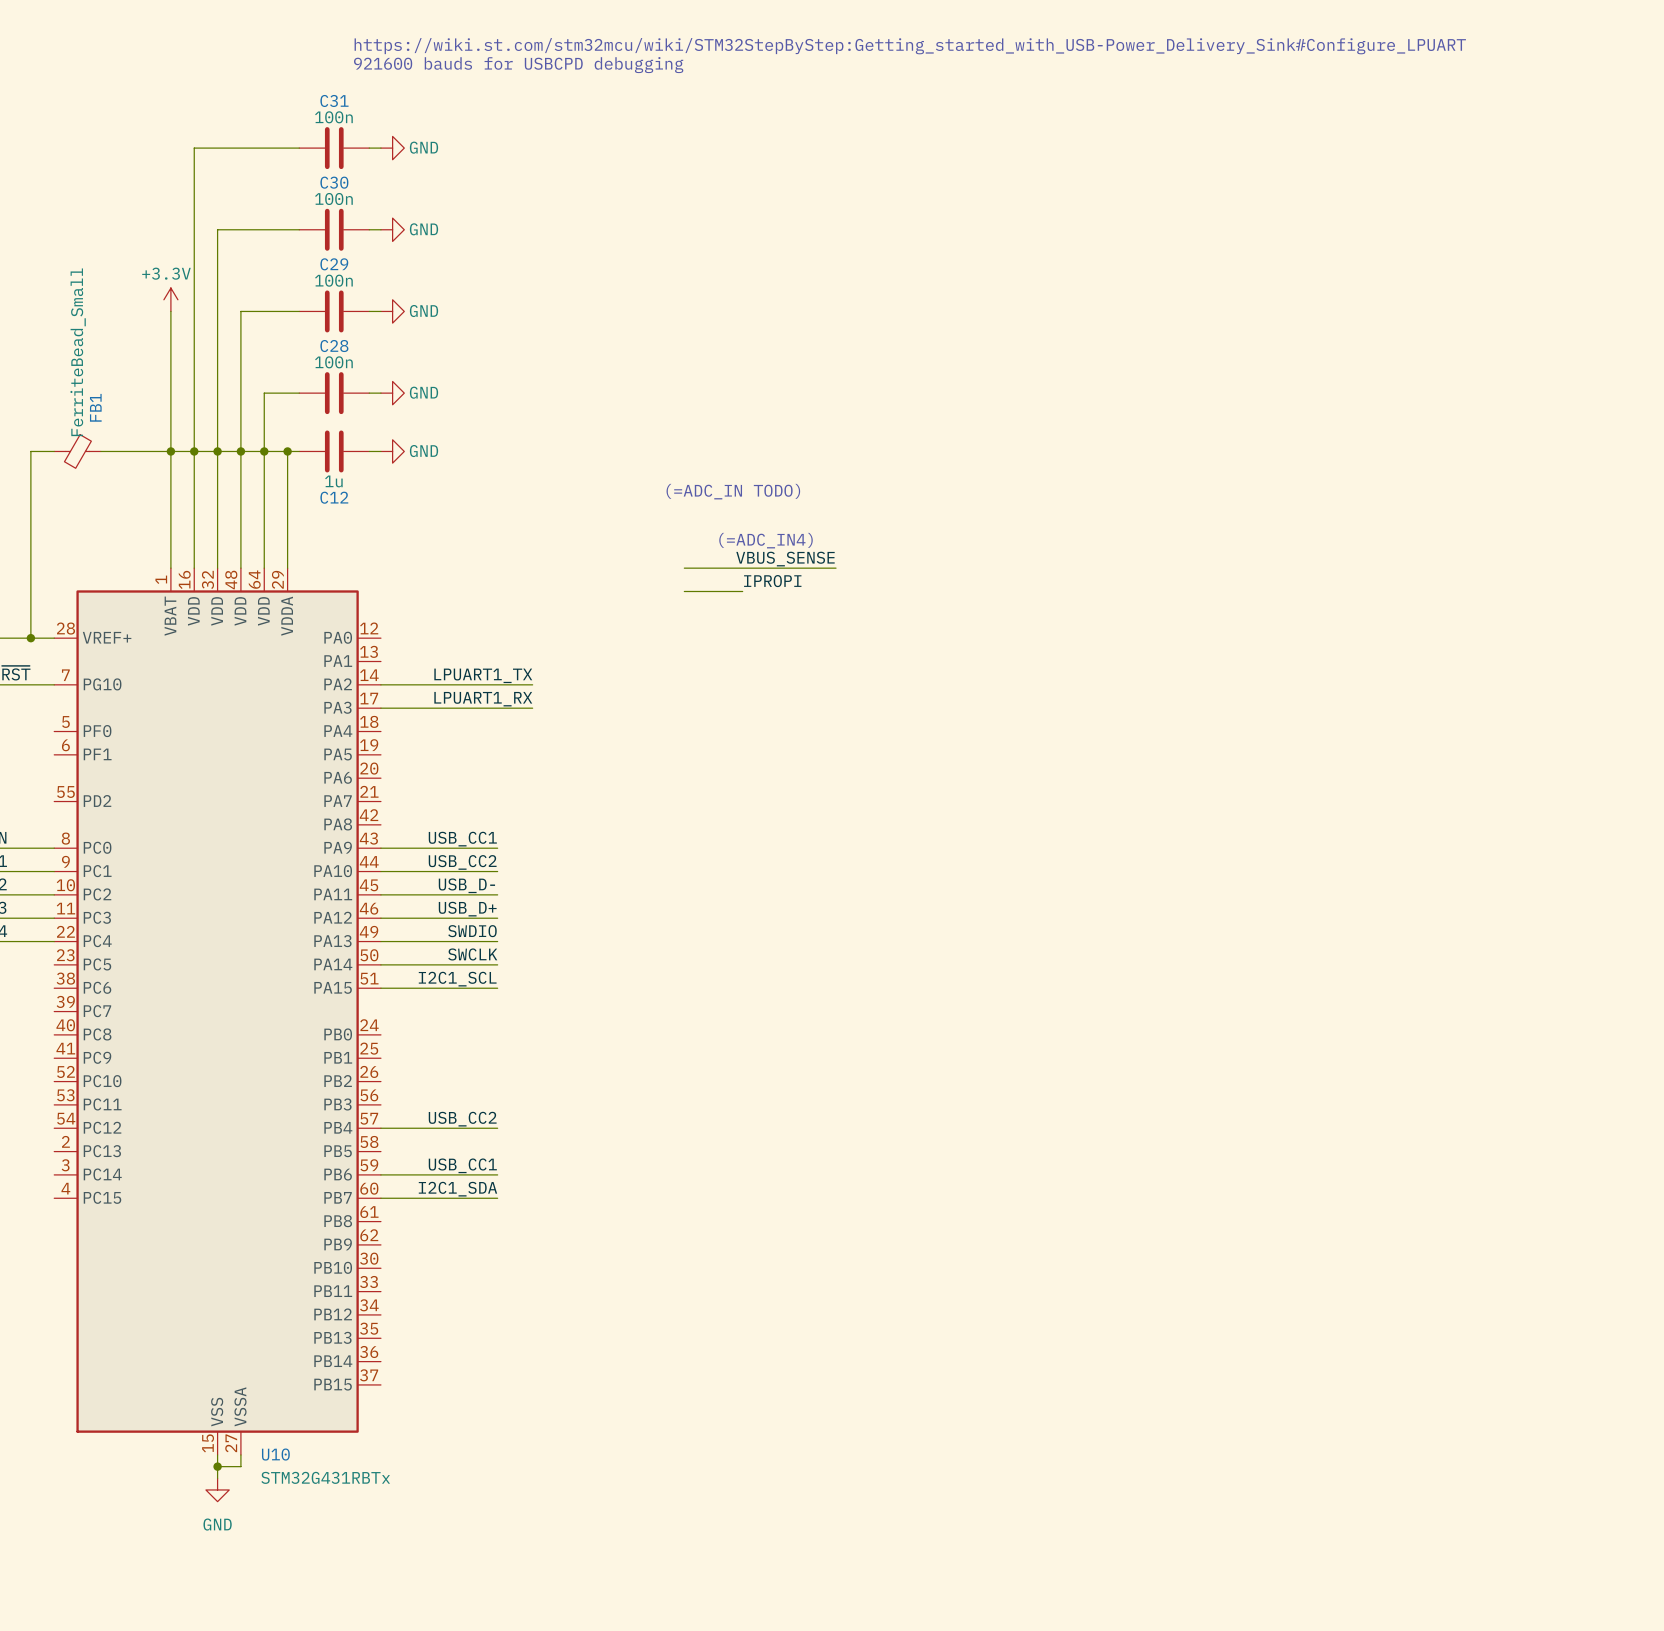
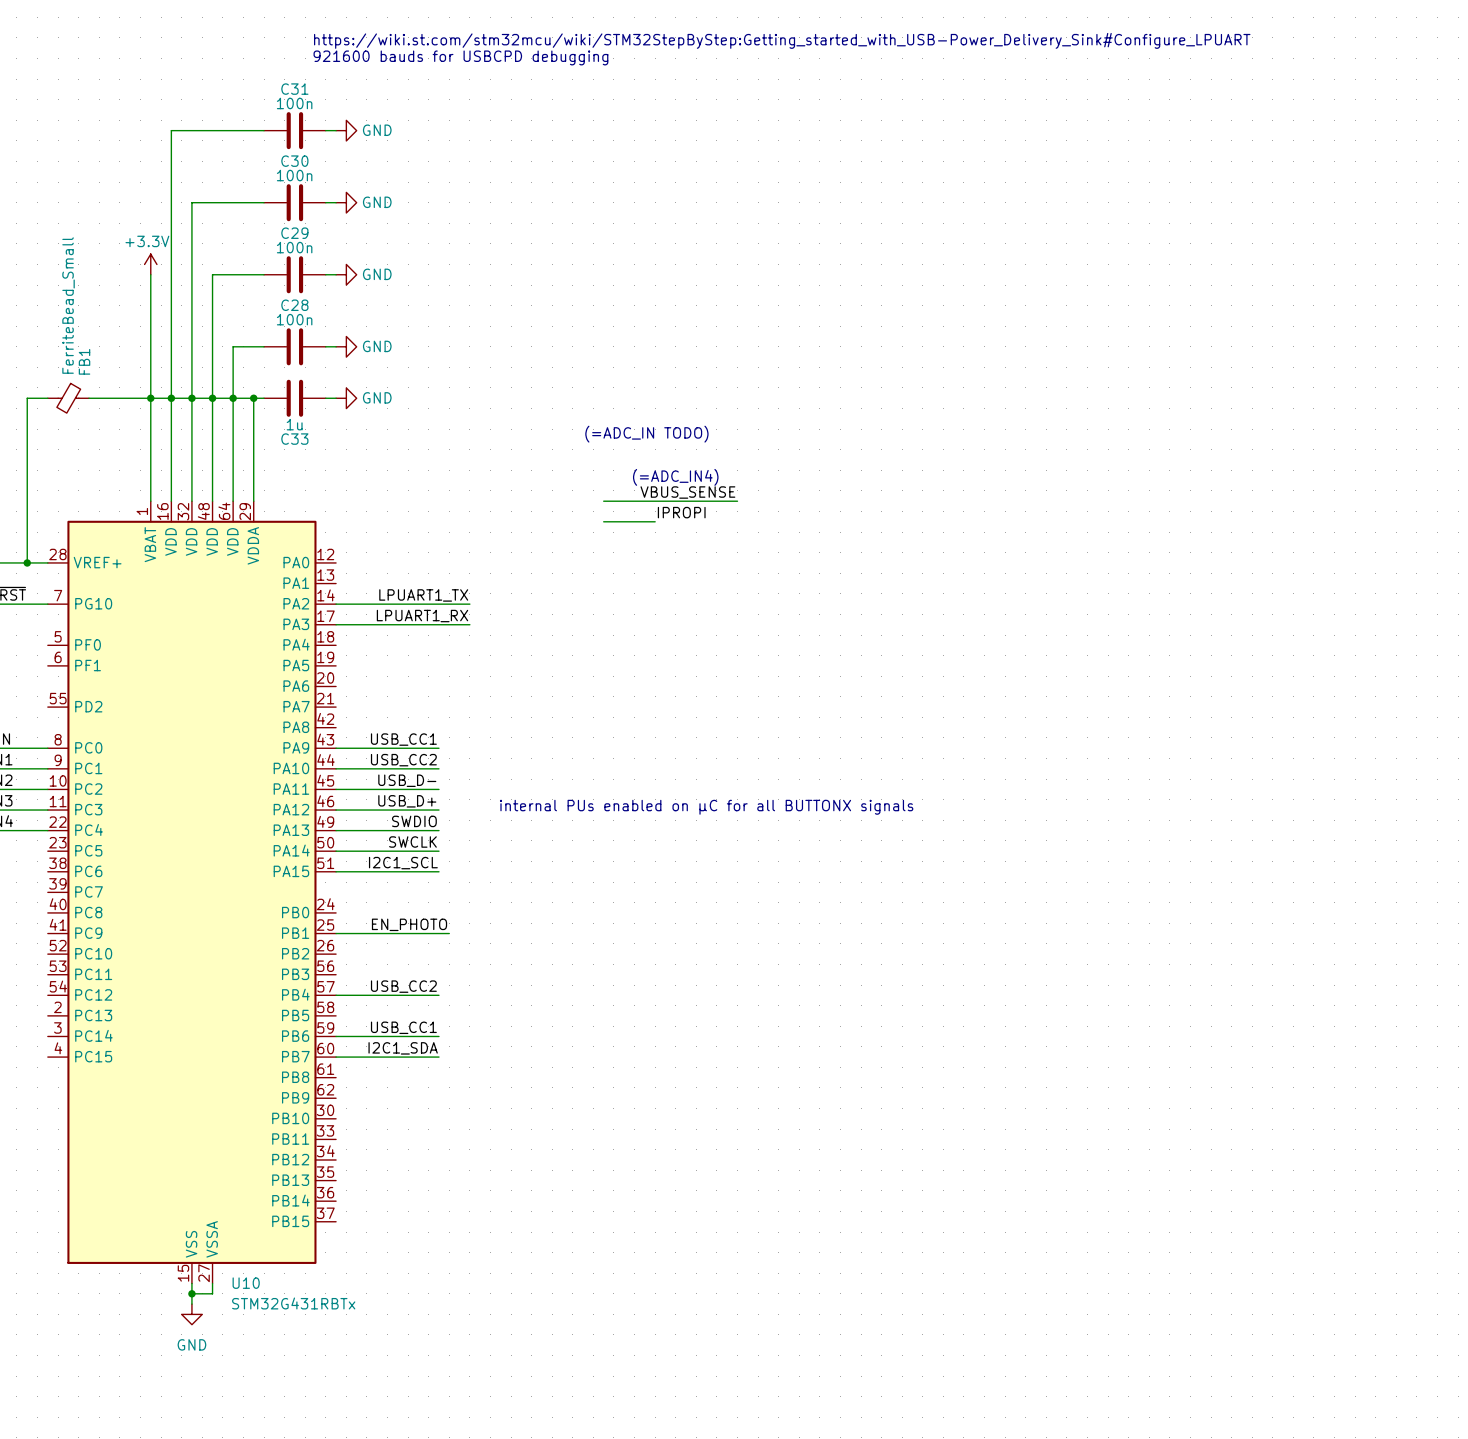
C12 name: C12 (334, 497) -> C33 (294, 439)
text: none -> internal PUs enabled on µC for all BUTTONX signals (706, 807)
label: none -> EN_PHOTO (409, 924)
wire: none -> (336, 933) (449, 933)

